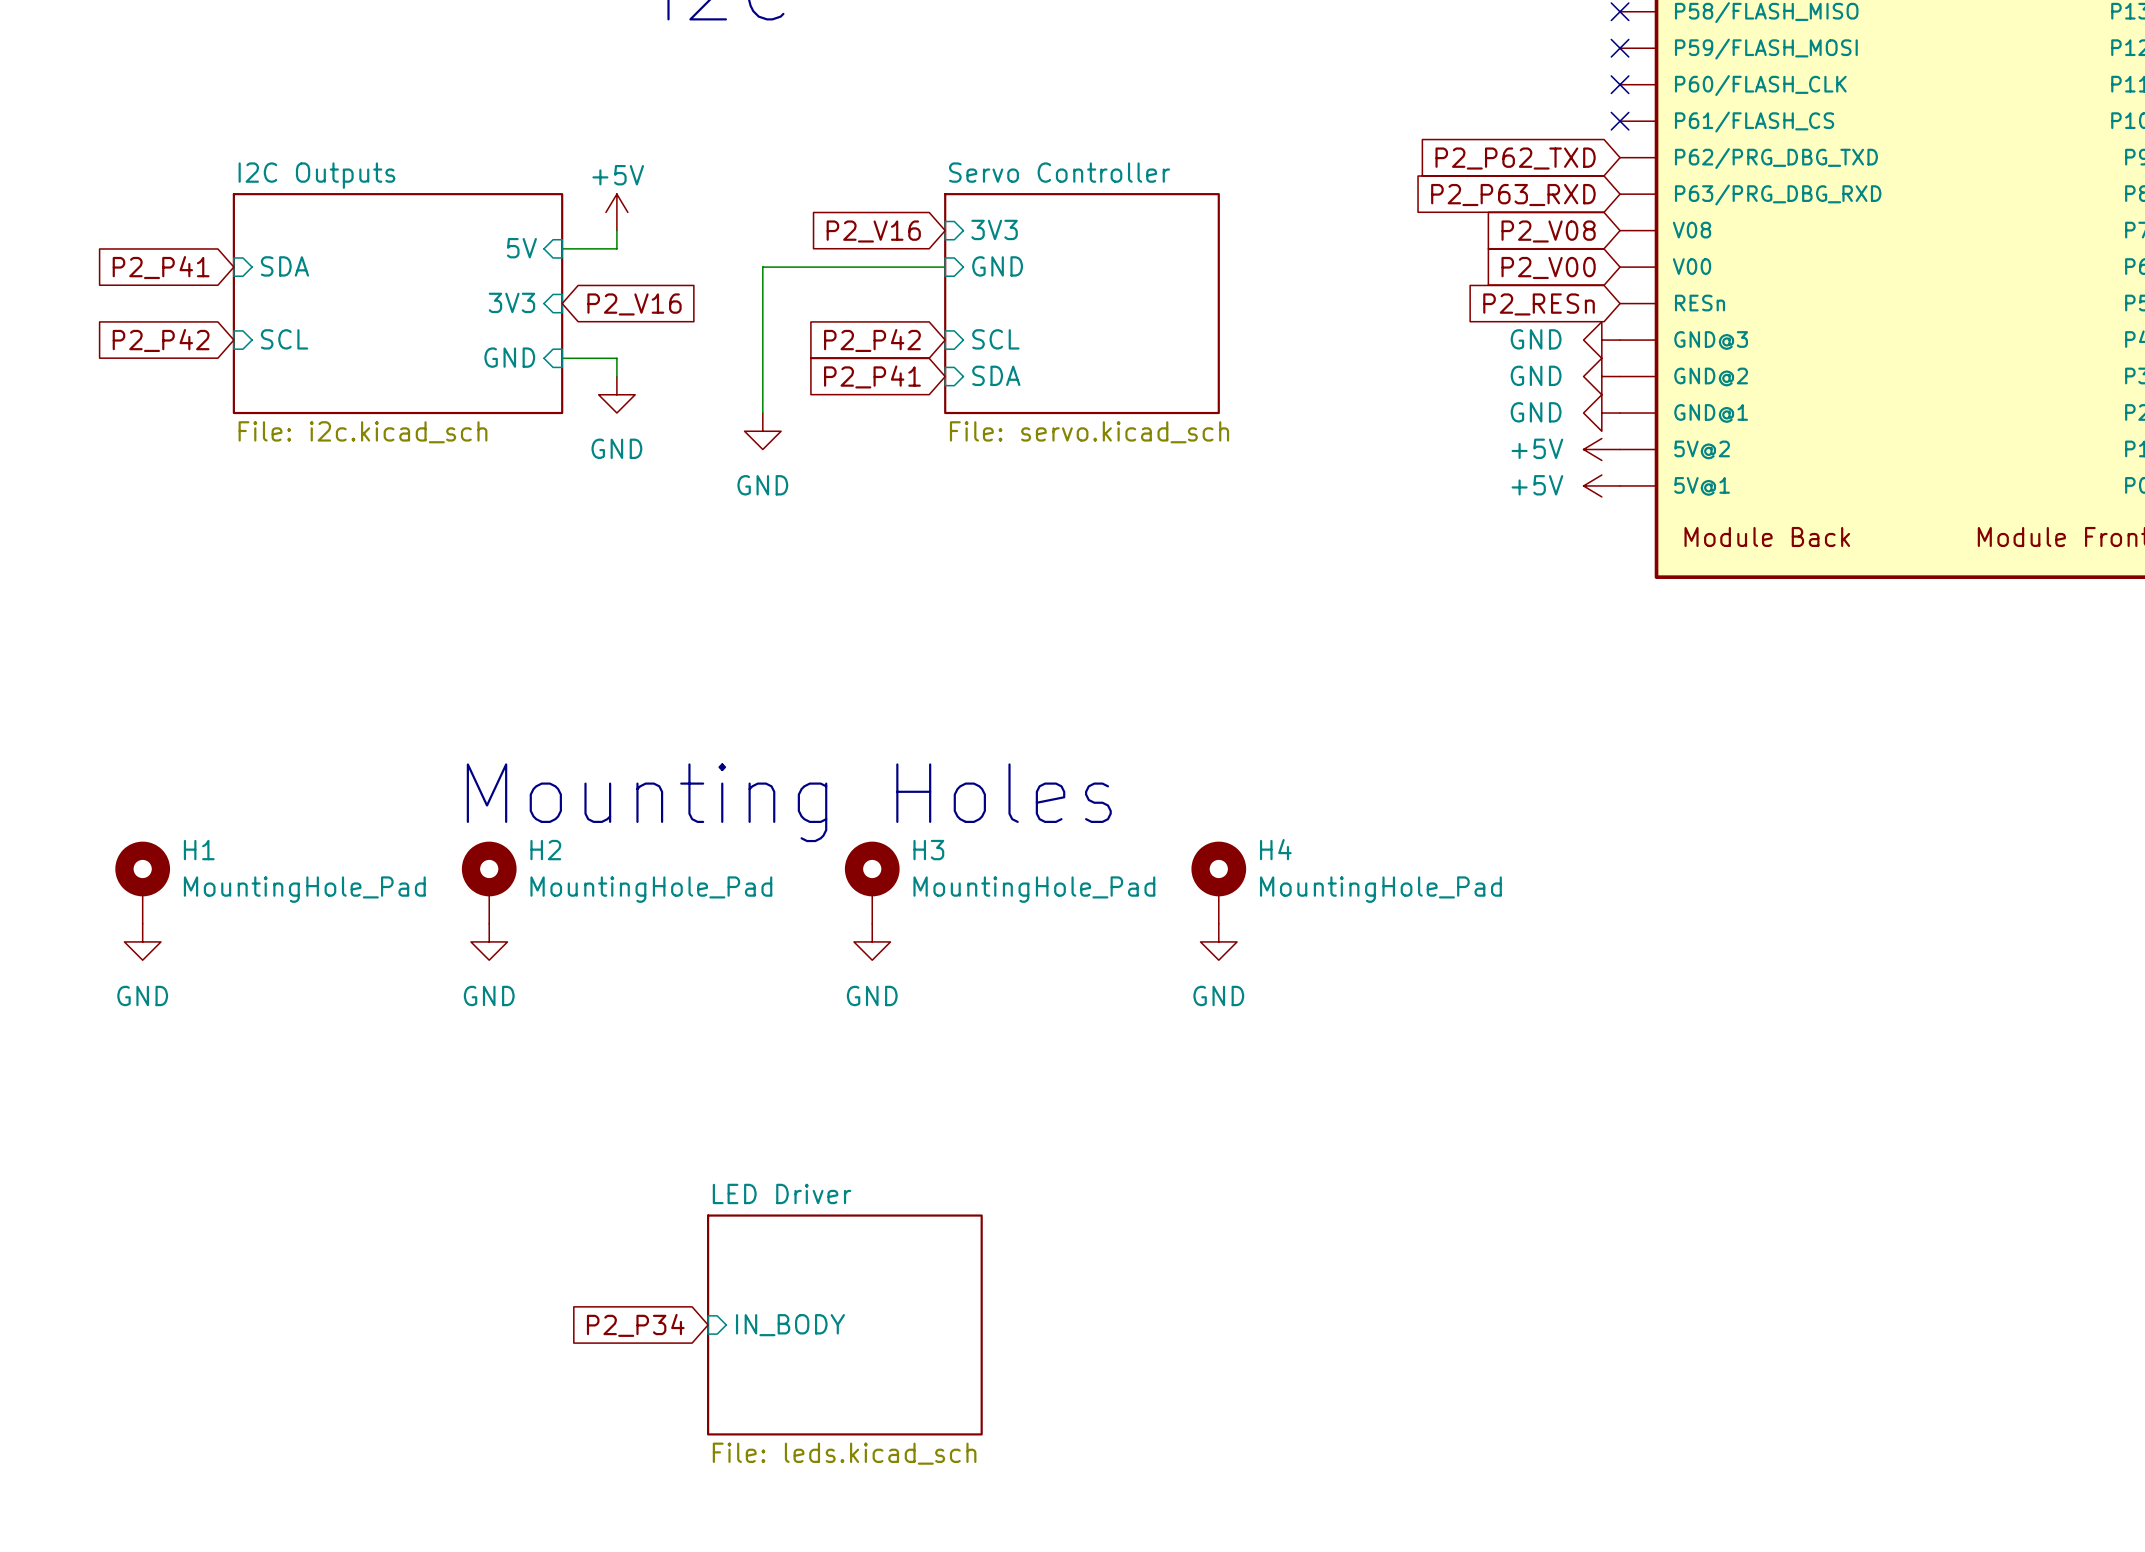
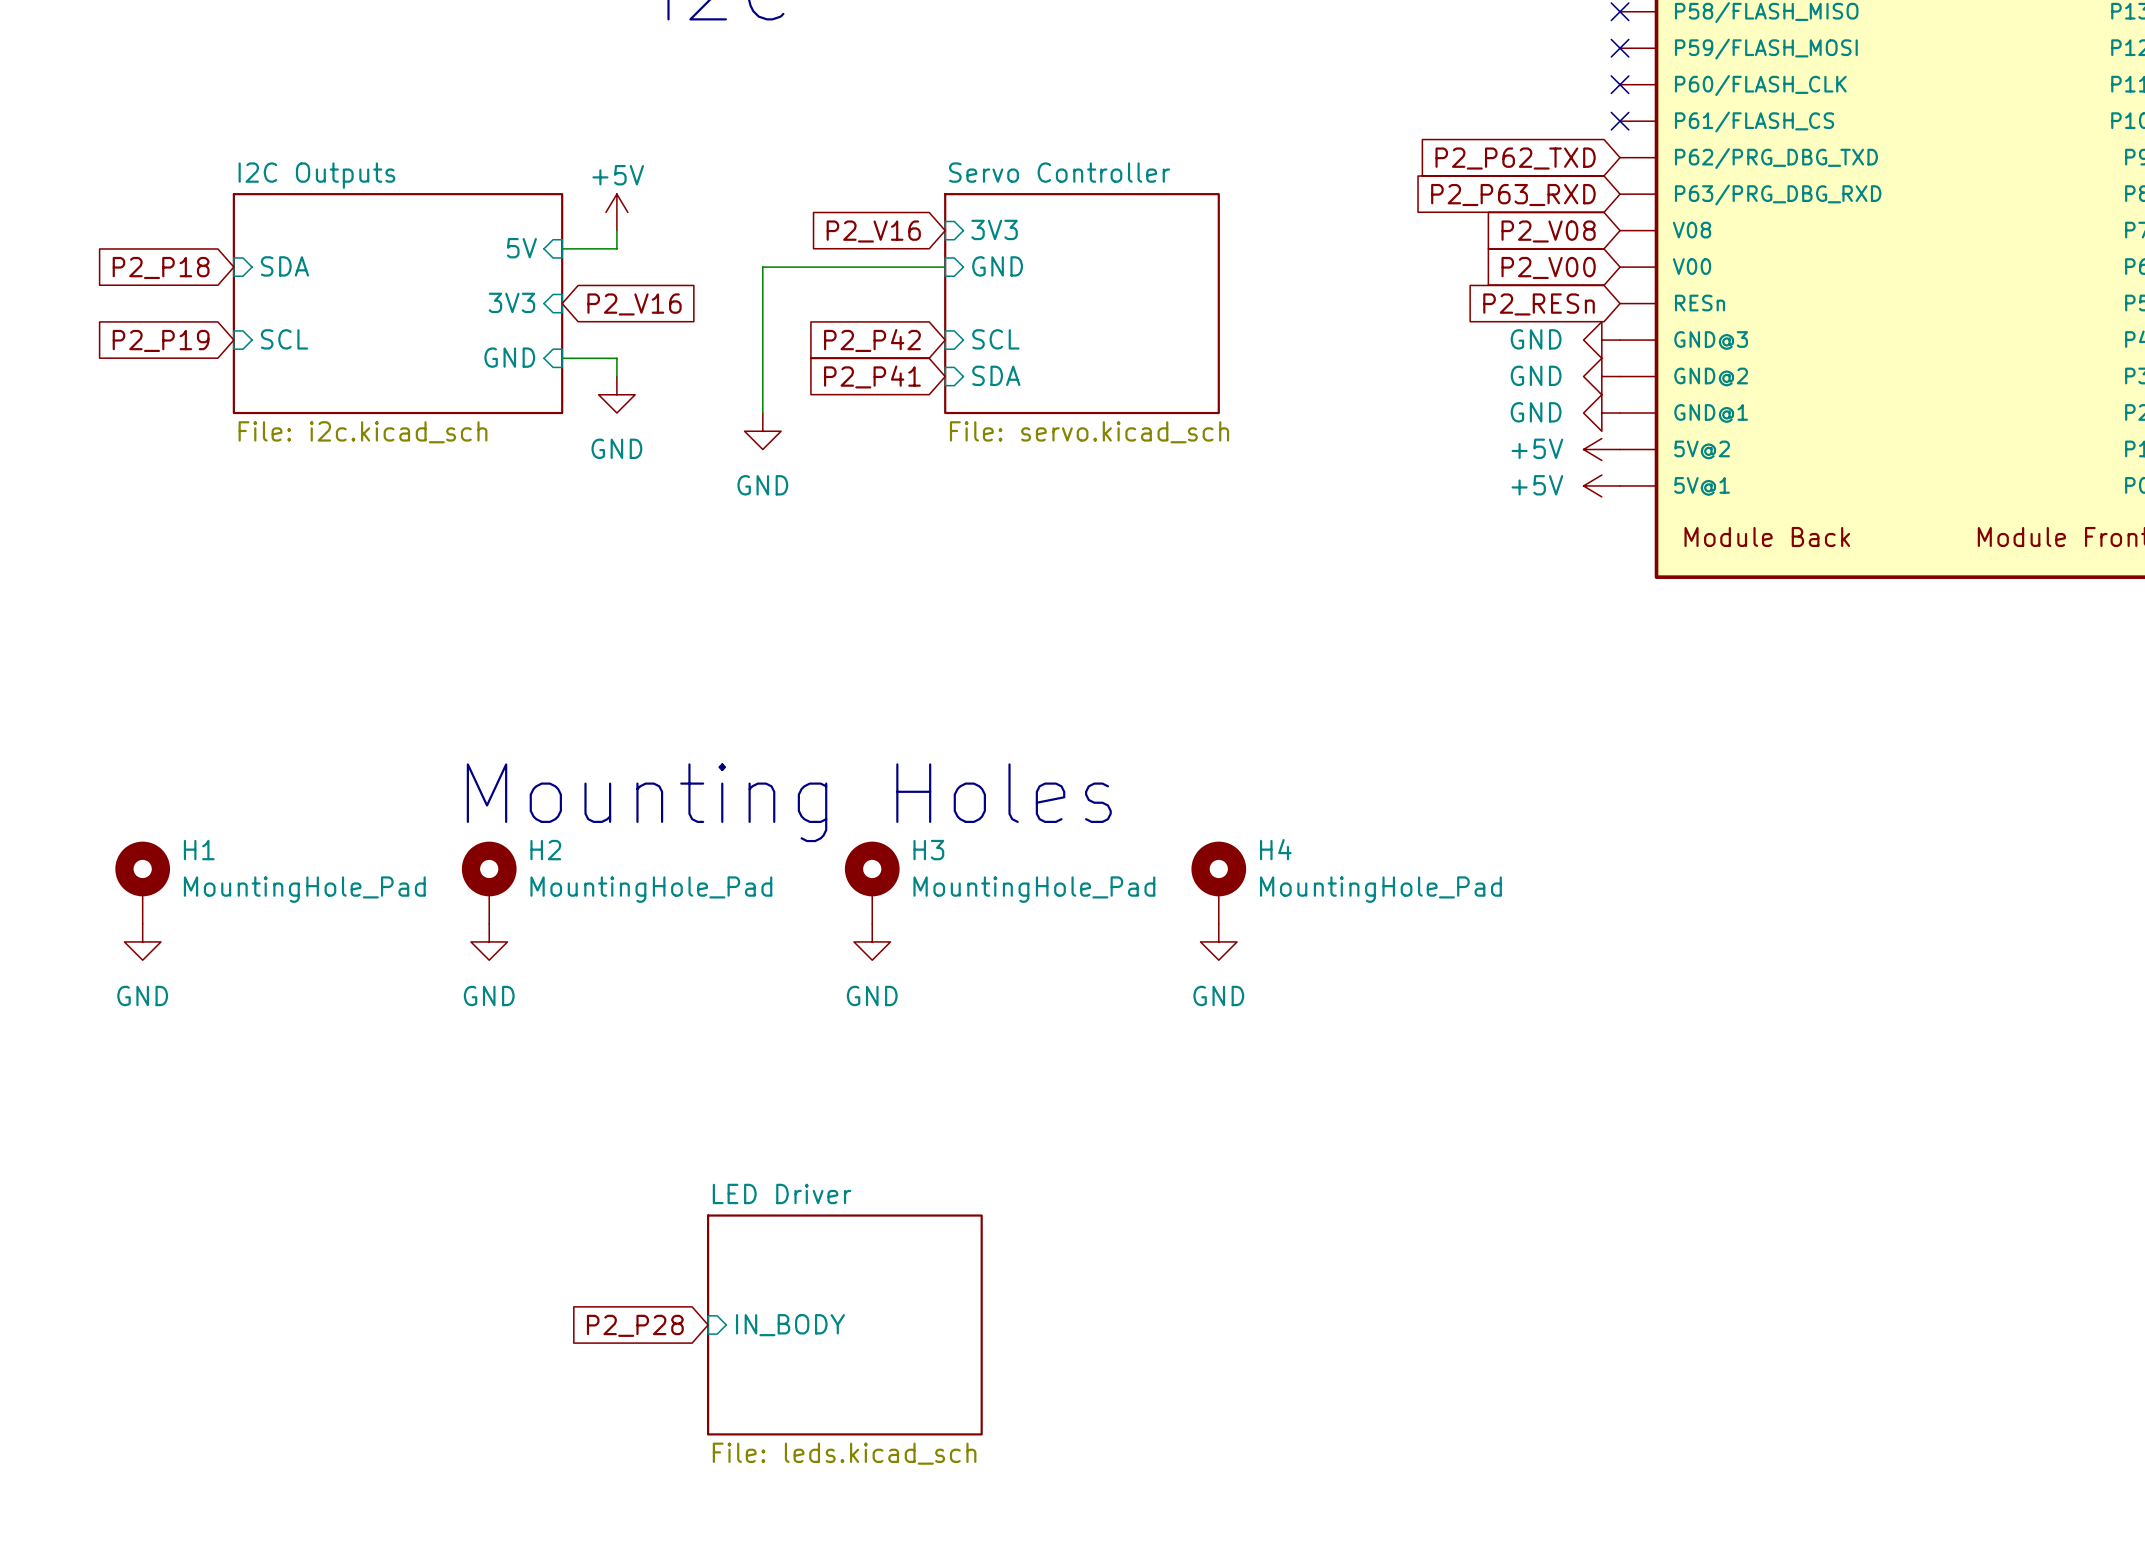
global label: P2_P41 (161, 267) -> P2_P18 (161, 267)
global label: P2_P42 (161, 340) -> P2_P19 (161, 340)
global label: P2_P34 (635, 1325) -> P2_P28 (635, 1325)

